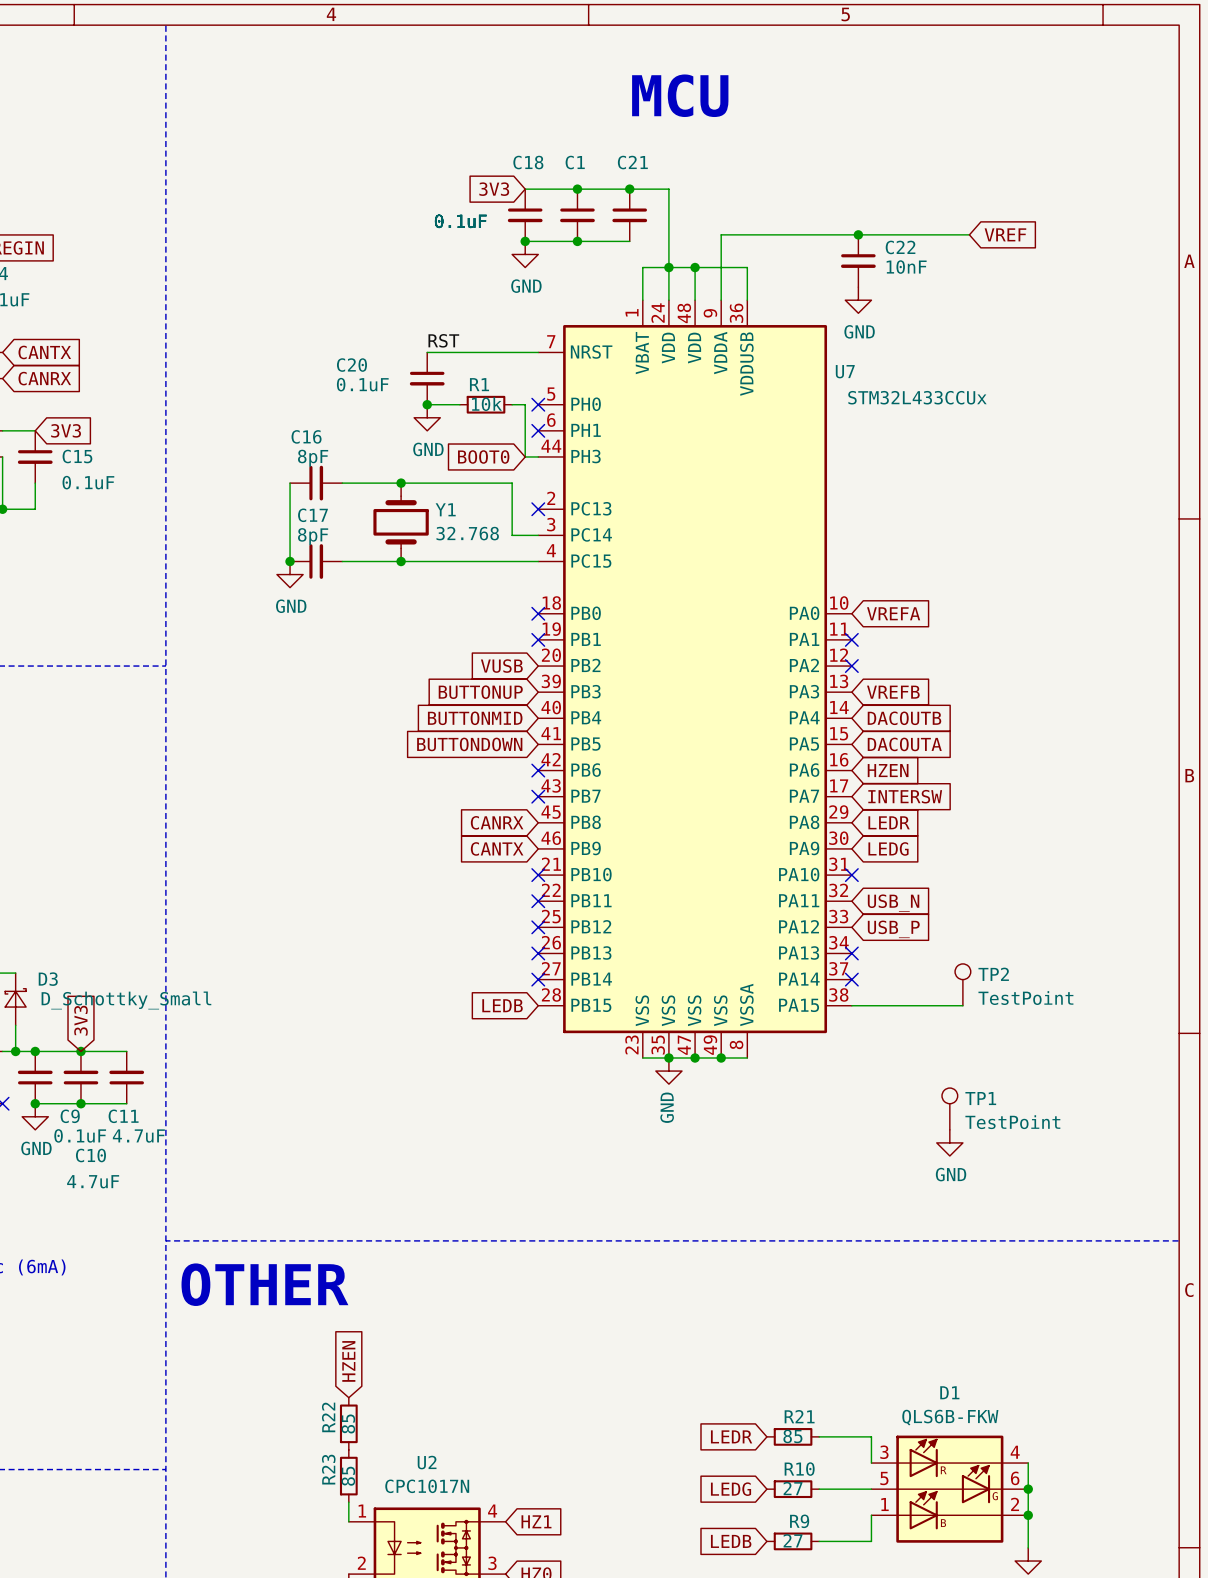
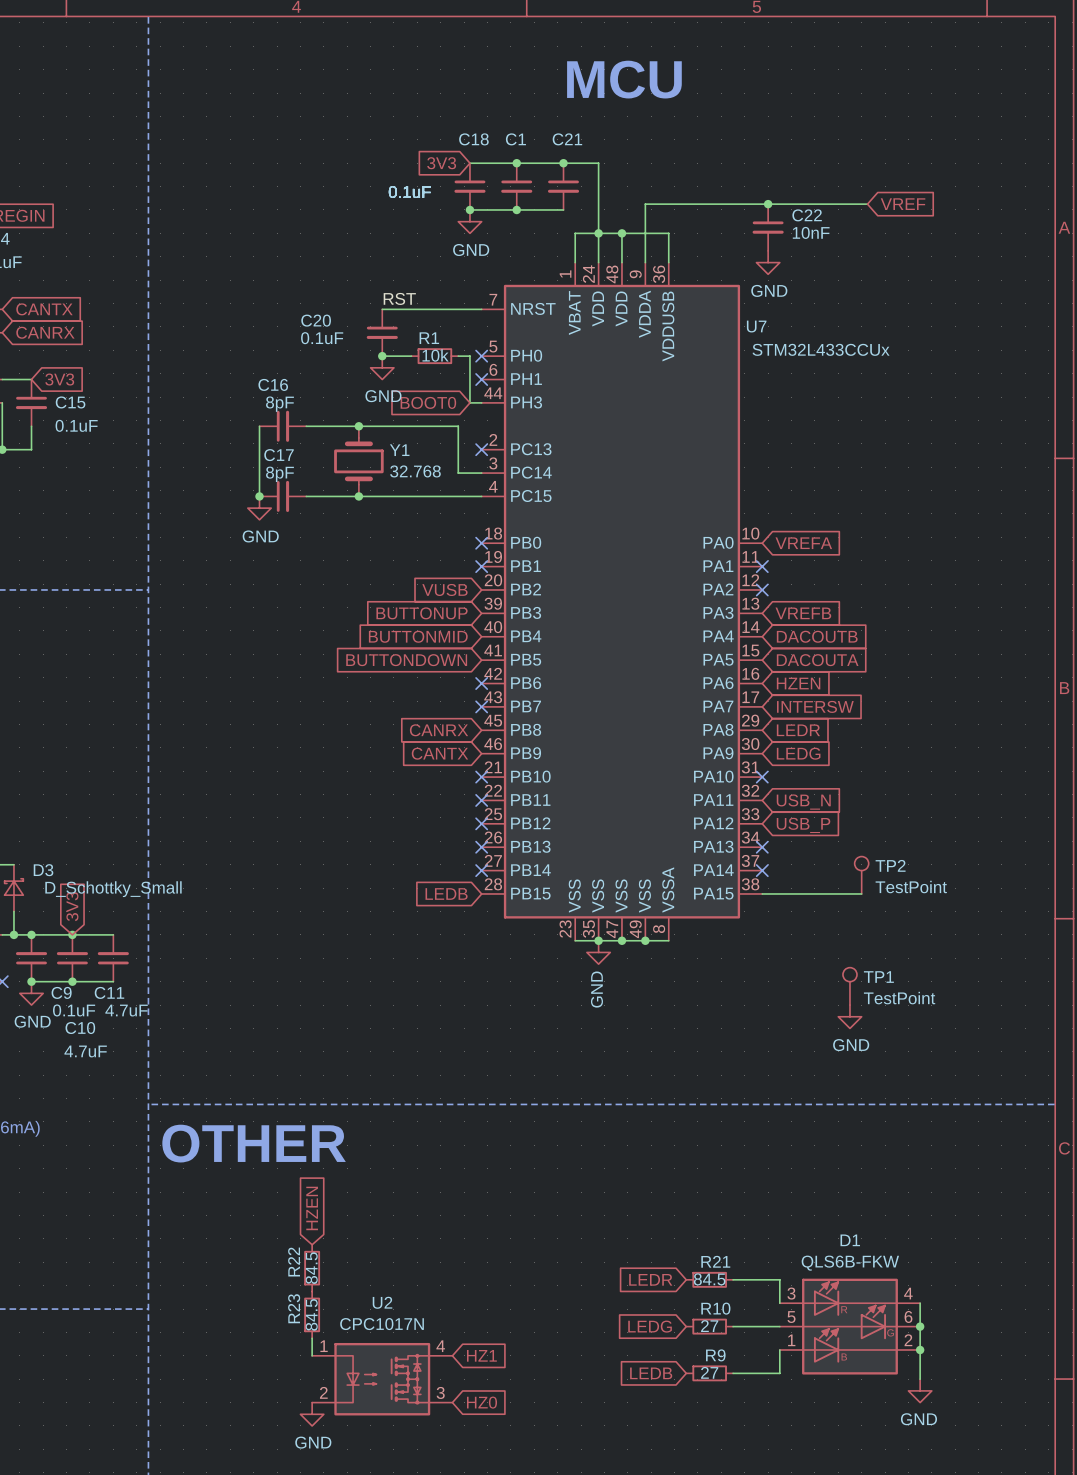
R22 value: 85 (348, 1423) -> 84.5 (311, 1268)
R21 value: 85 (792, 1436) -> 84.5 (709, 1279)
R23 value: 85 (348, 1476) -> 84.5 (311, 1314)

